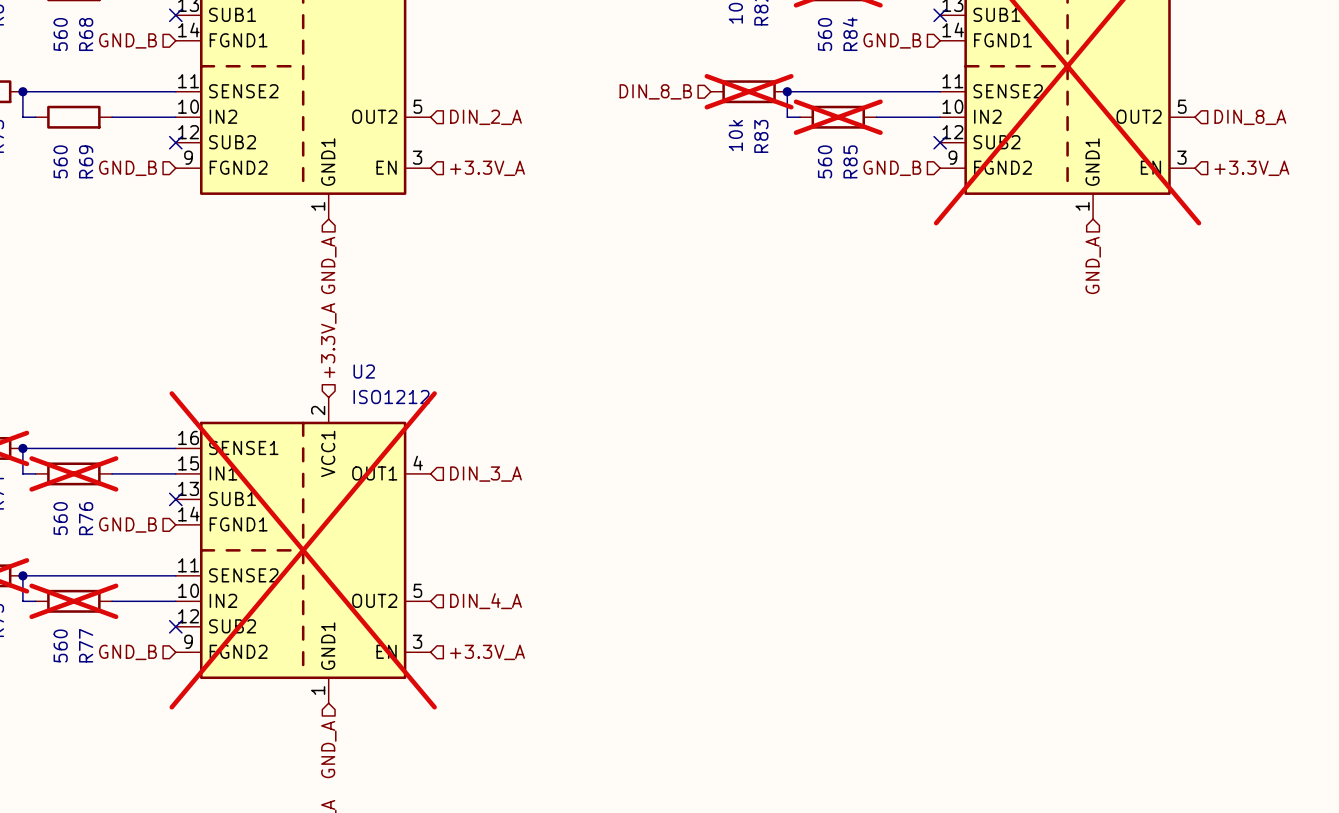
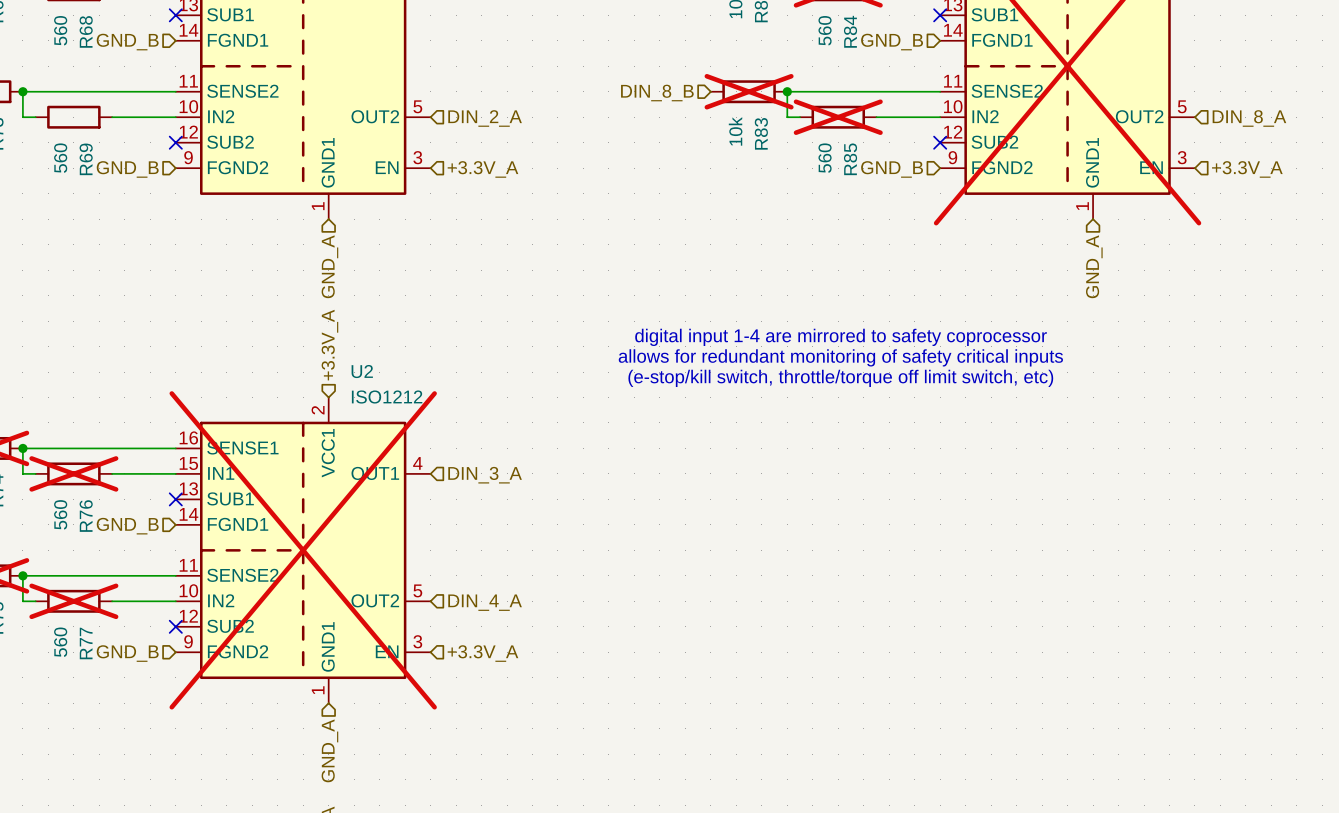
text: none -> digital input 1-4 are mirrored to safety coprocessor (841, 337)
text: none -> allows for redundant monitoring of safety critical inputs (840, 357)
text: none -> (e-stop/kill switch, throttle/torque off limit switch, etc) (840, 378)

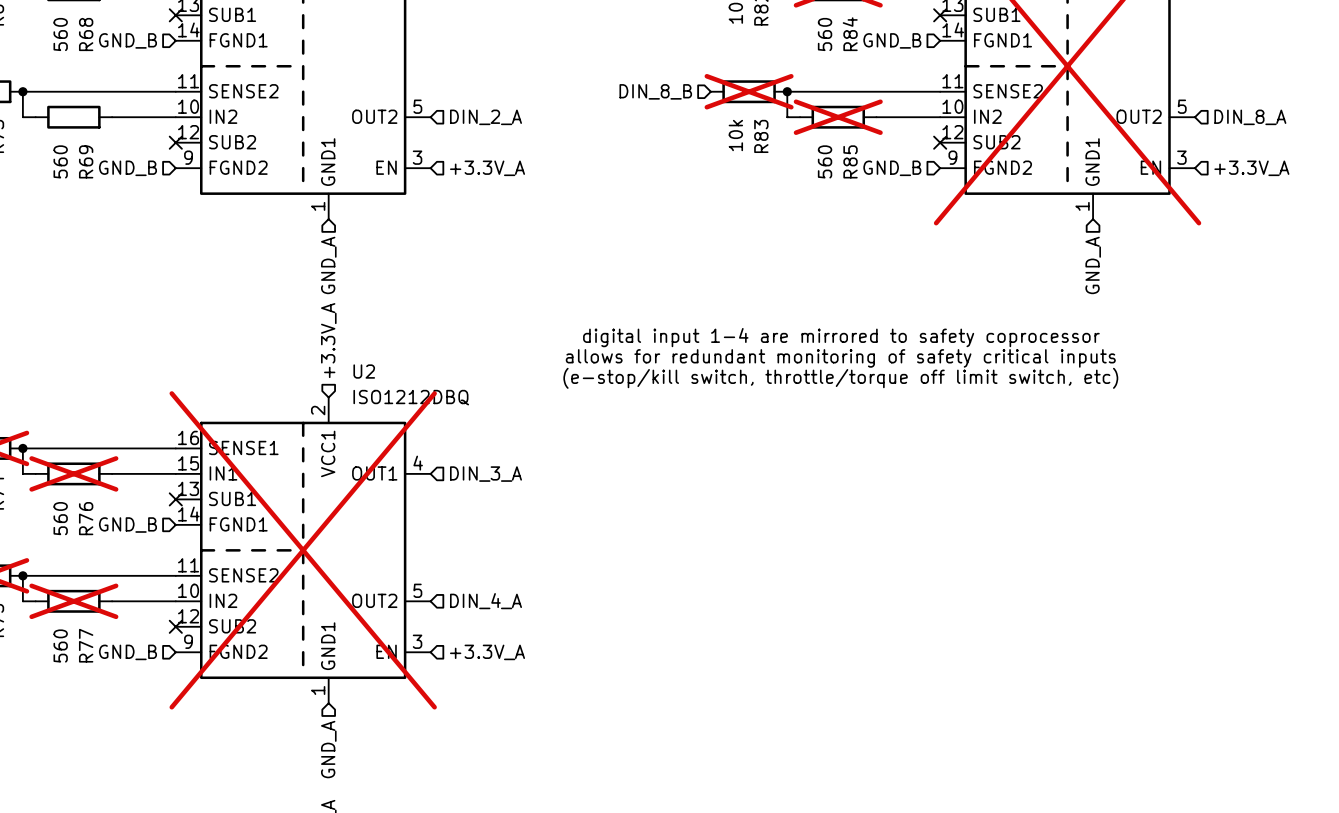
U2 value: ISO1212 (387, 397) -> ISO1212DBQ (411, 397)

